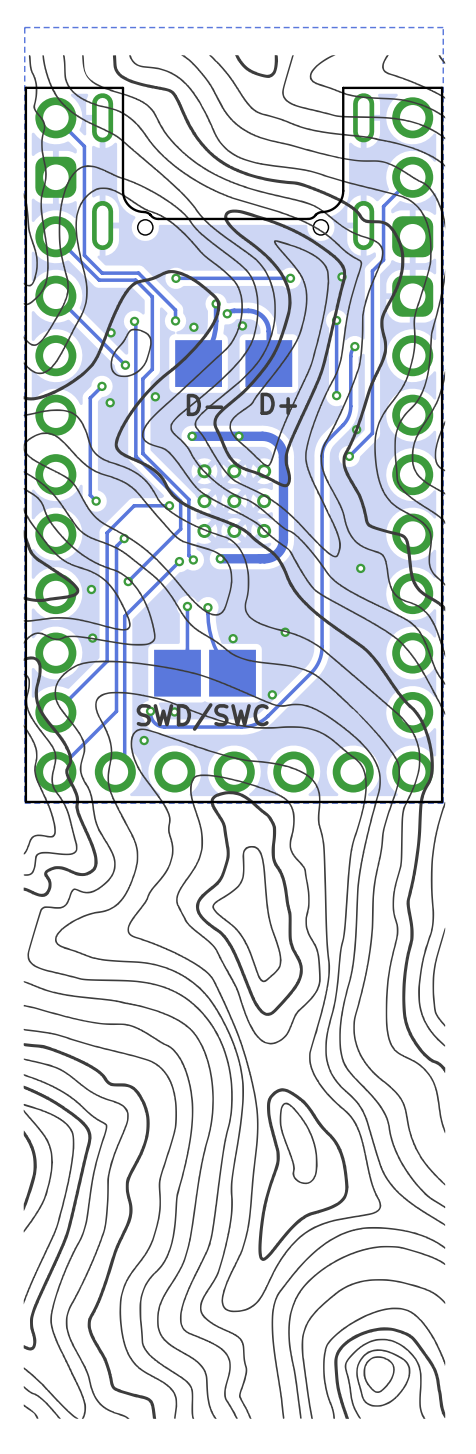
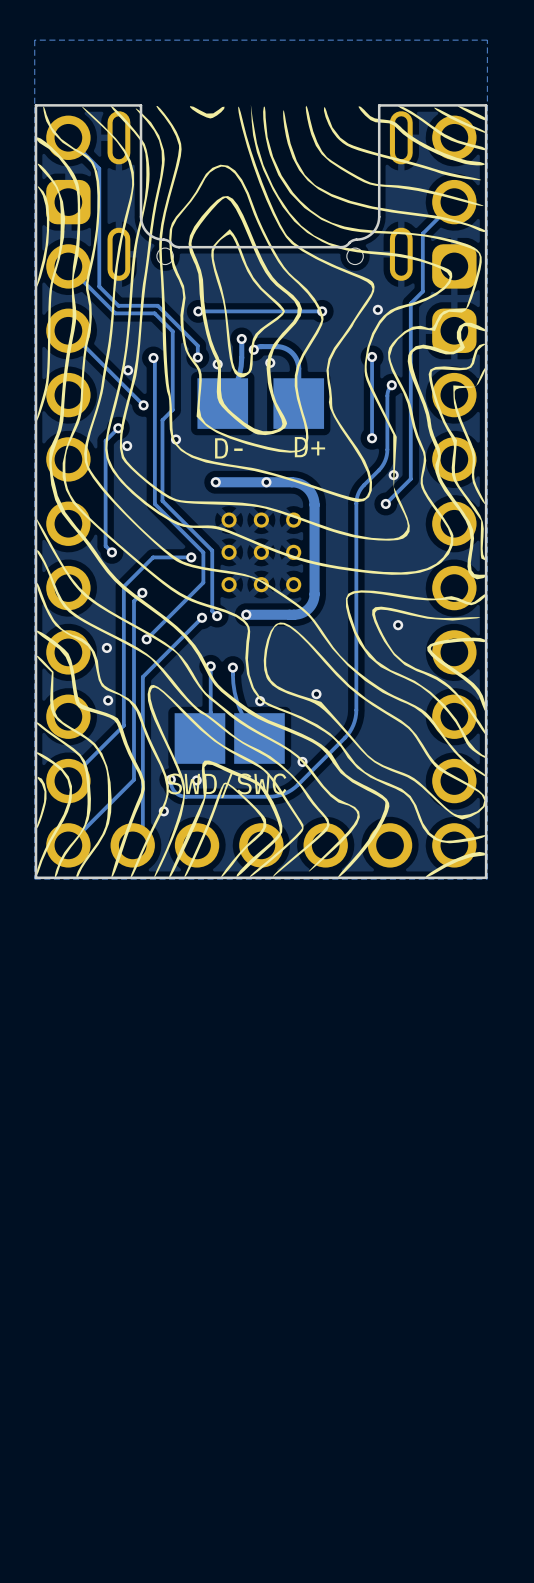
drawing: [23, 55, 446, 1419] -> none
drawing: none -> [36, 104, 487, 878]

